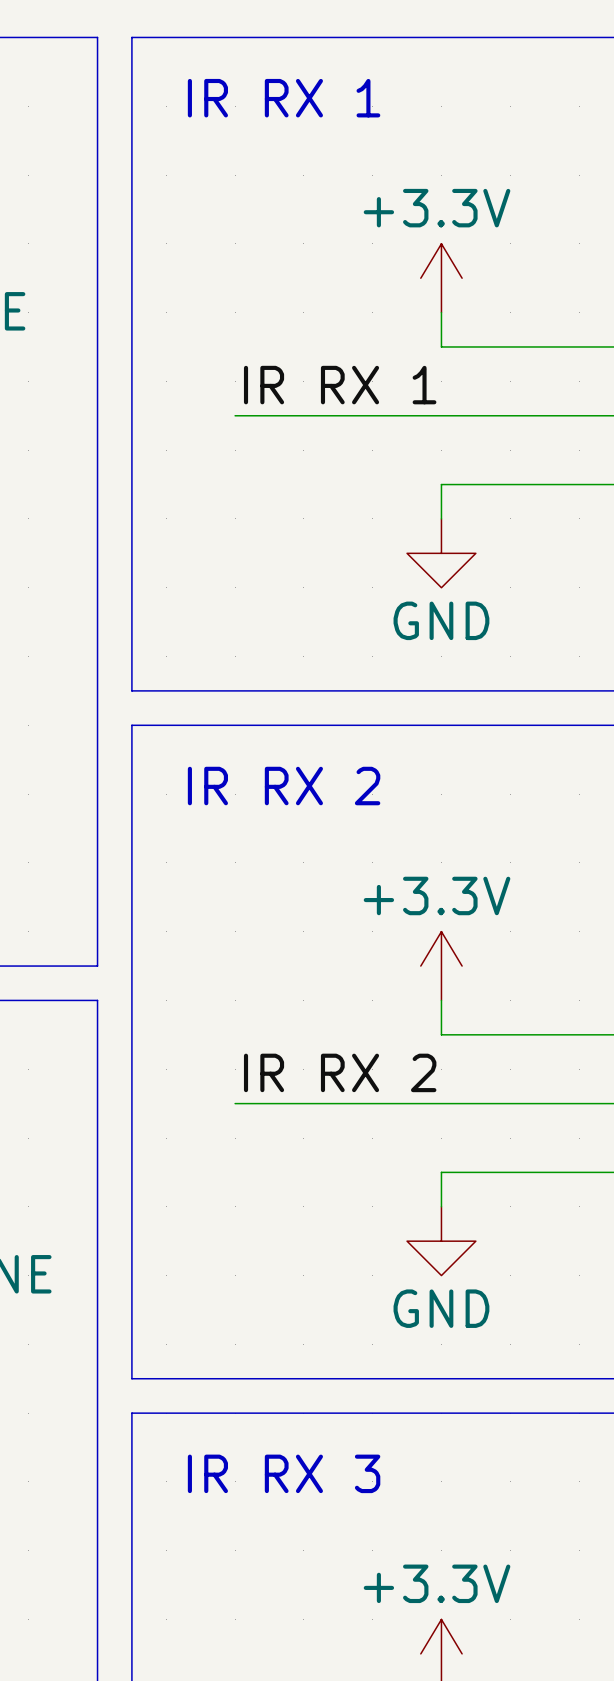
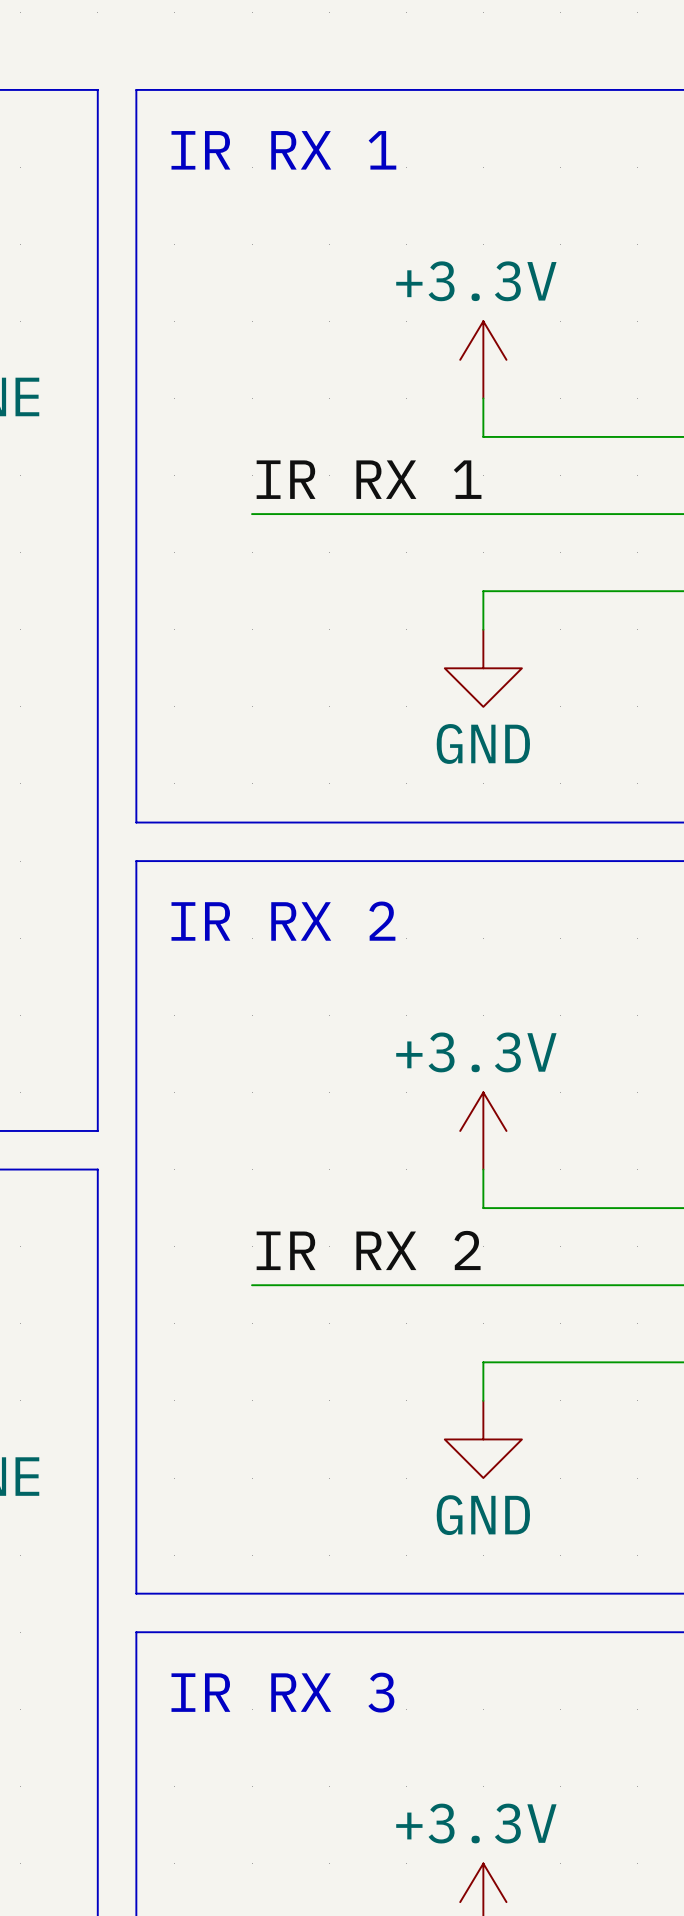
text position: IR RX 1 (284, 98) -> IR RX 1 (283, 150)
text position: IR RX 2 (284, 786) -> IR RX 2 (283, 921)
text position: IR RX 3 (284, 1473) -> IR RX 3 (282, 1692)

